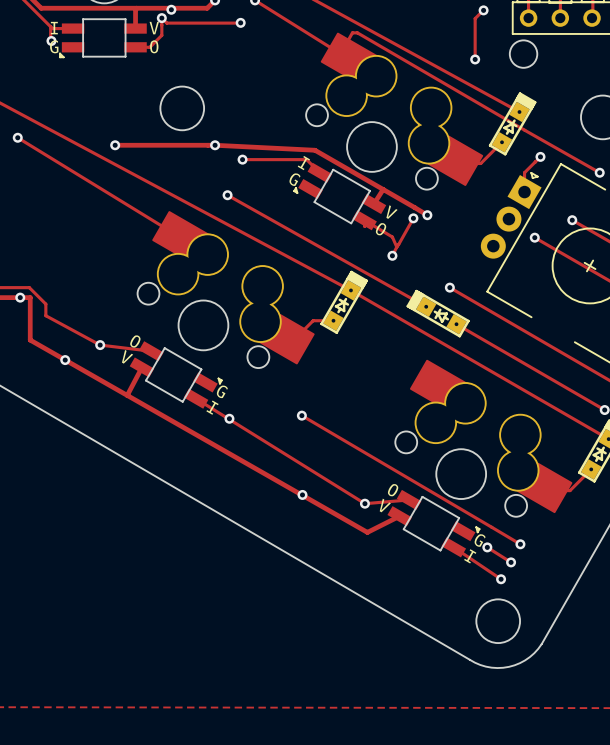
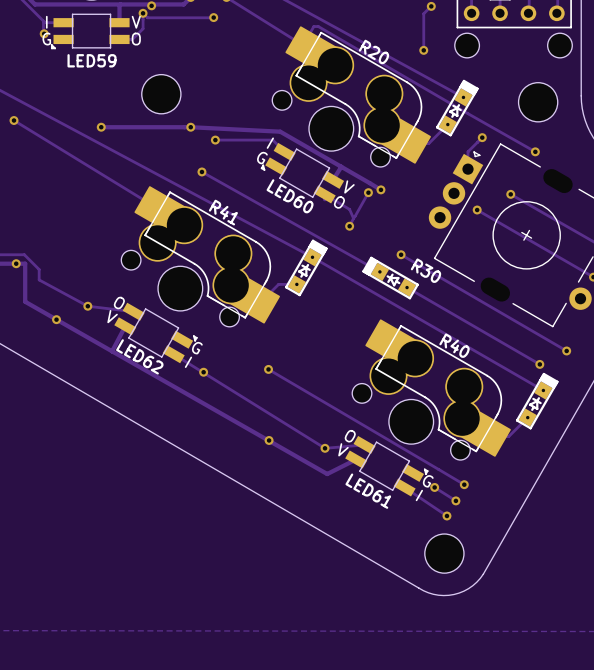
drawing: none -> [295, 31, 423, 159]
text: none -> R20 (373, 51)
text: none -> LED59 (92, 60)
drawing: none -> [144, 191, 272, 319]
text: none -> LED60 (290, 196)
text: none -> R41 (223, 212)
text: none -> R30 (425, 270)
drawing: none -> [375, 325, 503, 453]
text: none -> R40 (454, 345)
text: none -> LED62 (139, 356)
text: none -> LED61 (368, 491)

